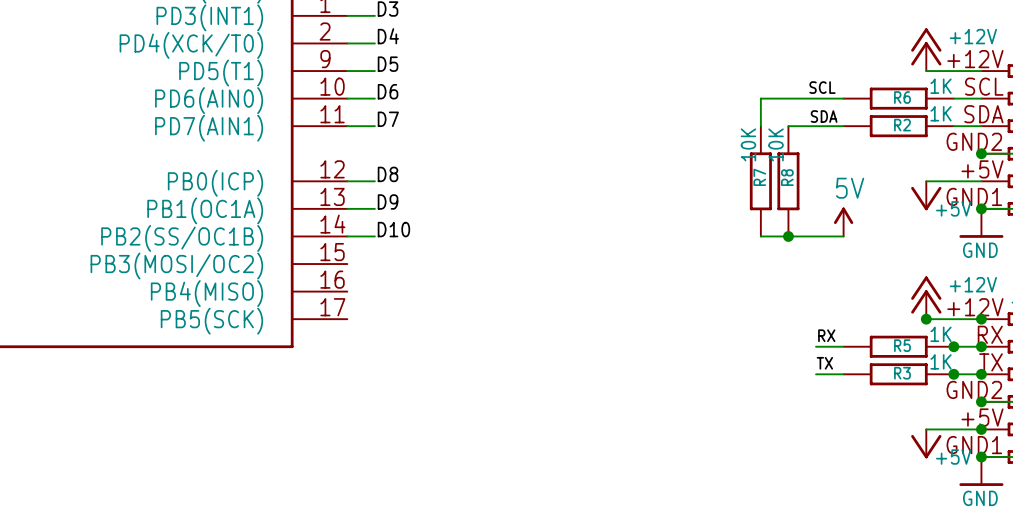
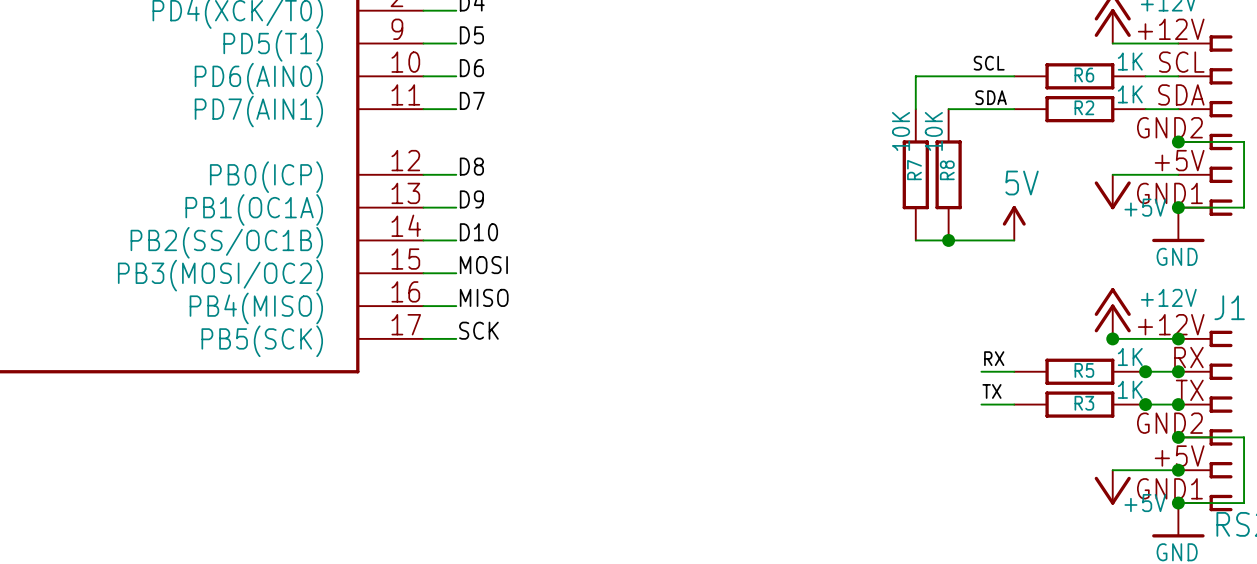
label: none -> MOSI (483, 265)
wire: none -> (423, 273) (456, 273)
label: none -> MISO (484, 297)
wire: none -> (423, 306) (456, 306)
label: none -> SCK (478, 330)
wire: none -> (423, 338) (456, 338)

